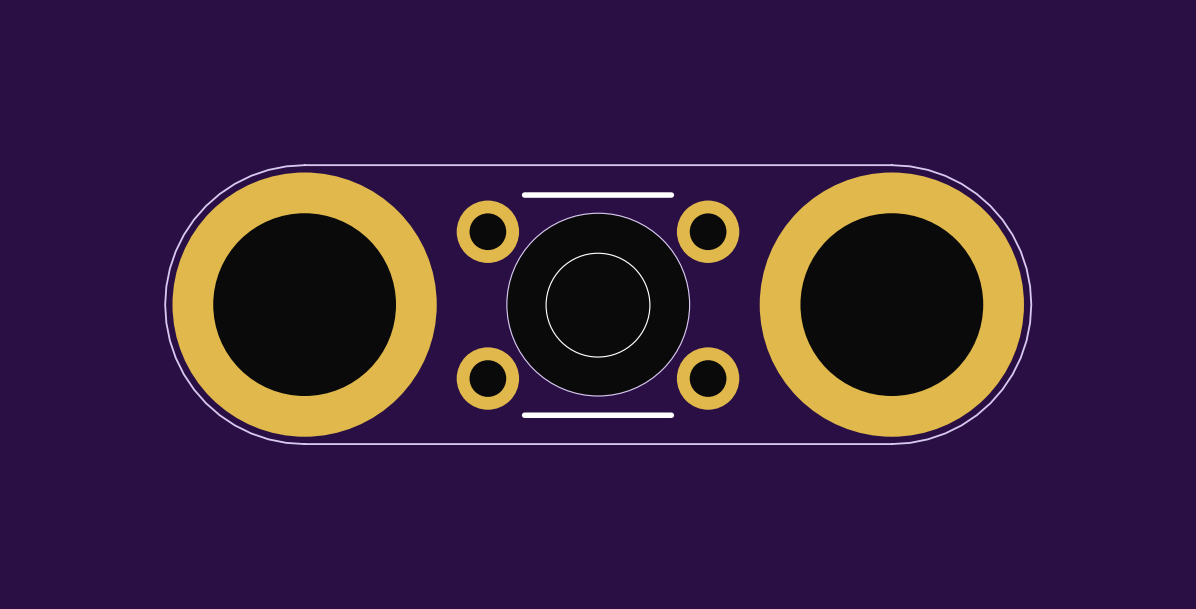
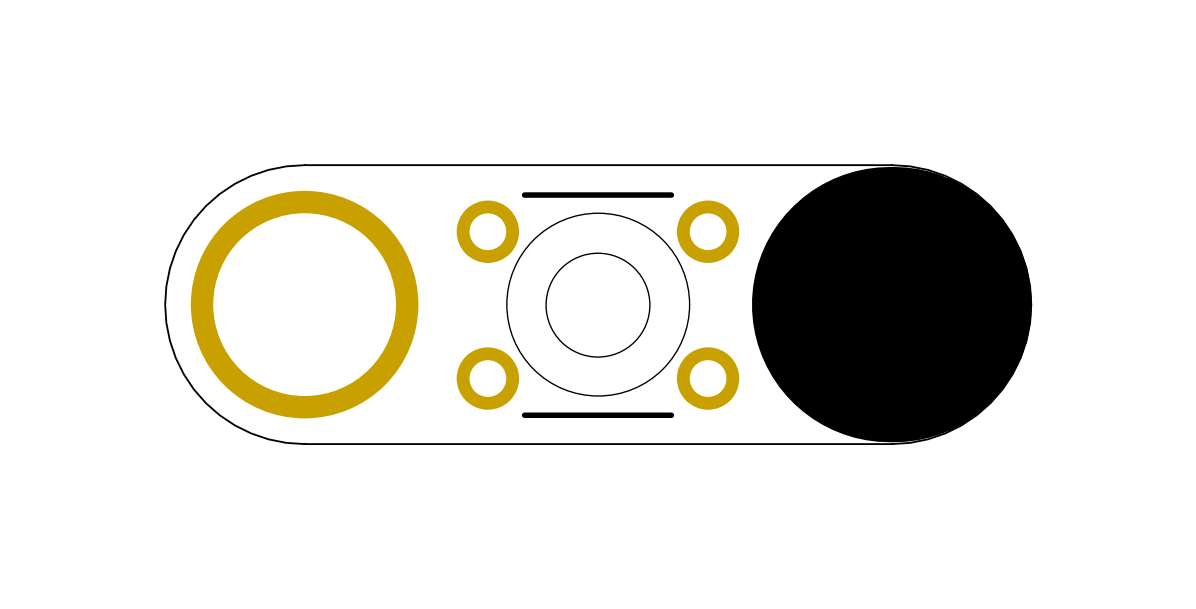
part footprint: [164, 164, 1033, 446] -> [164, 164, 1033, 446]

